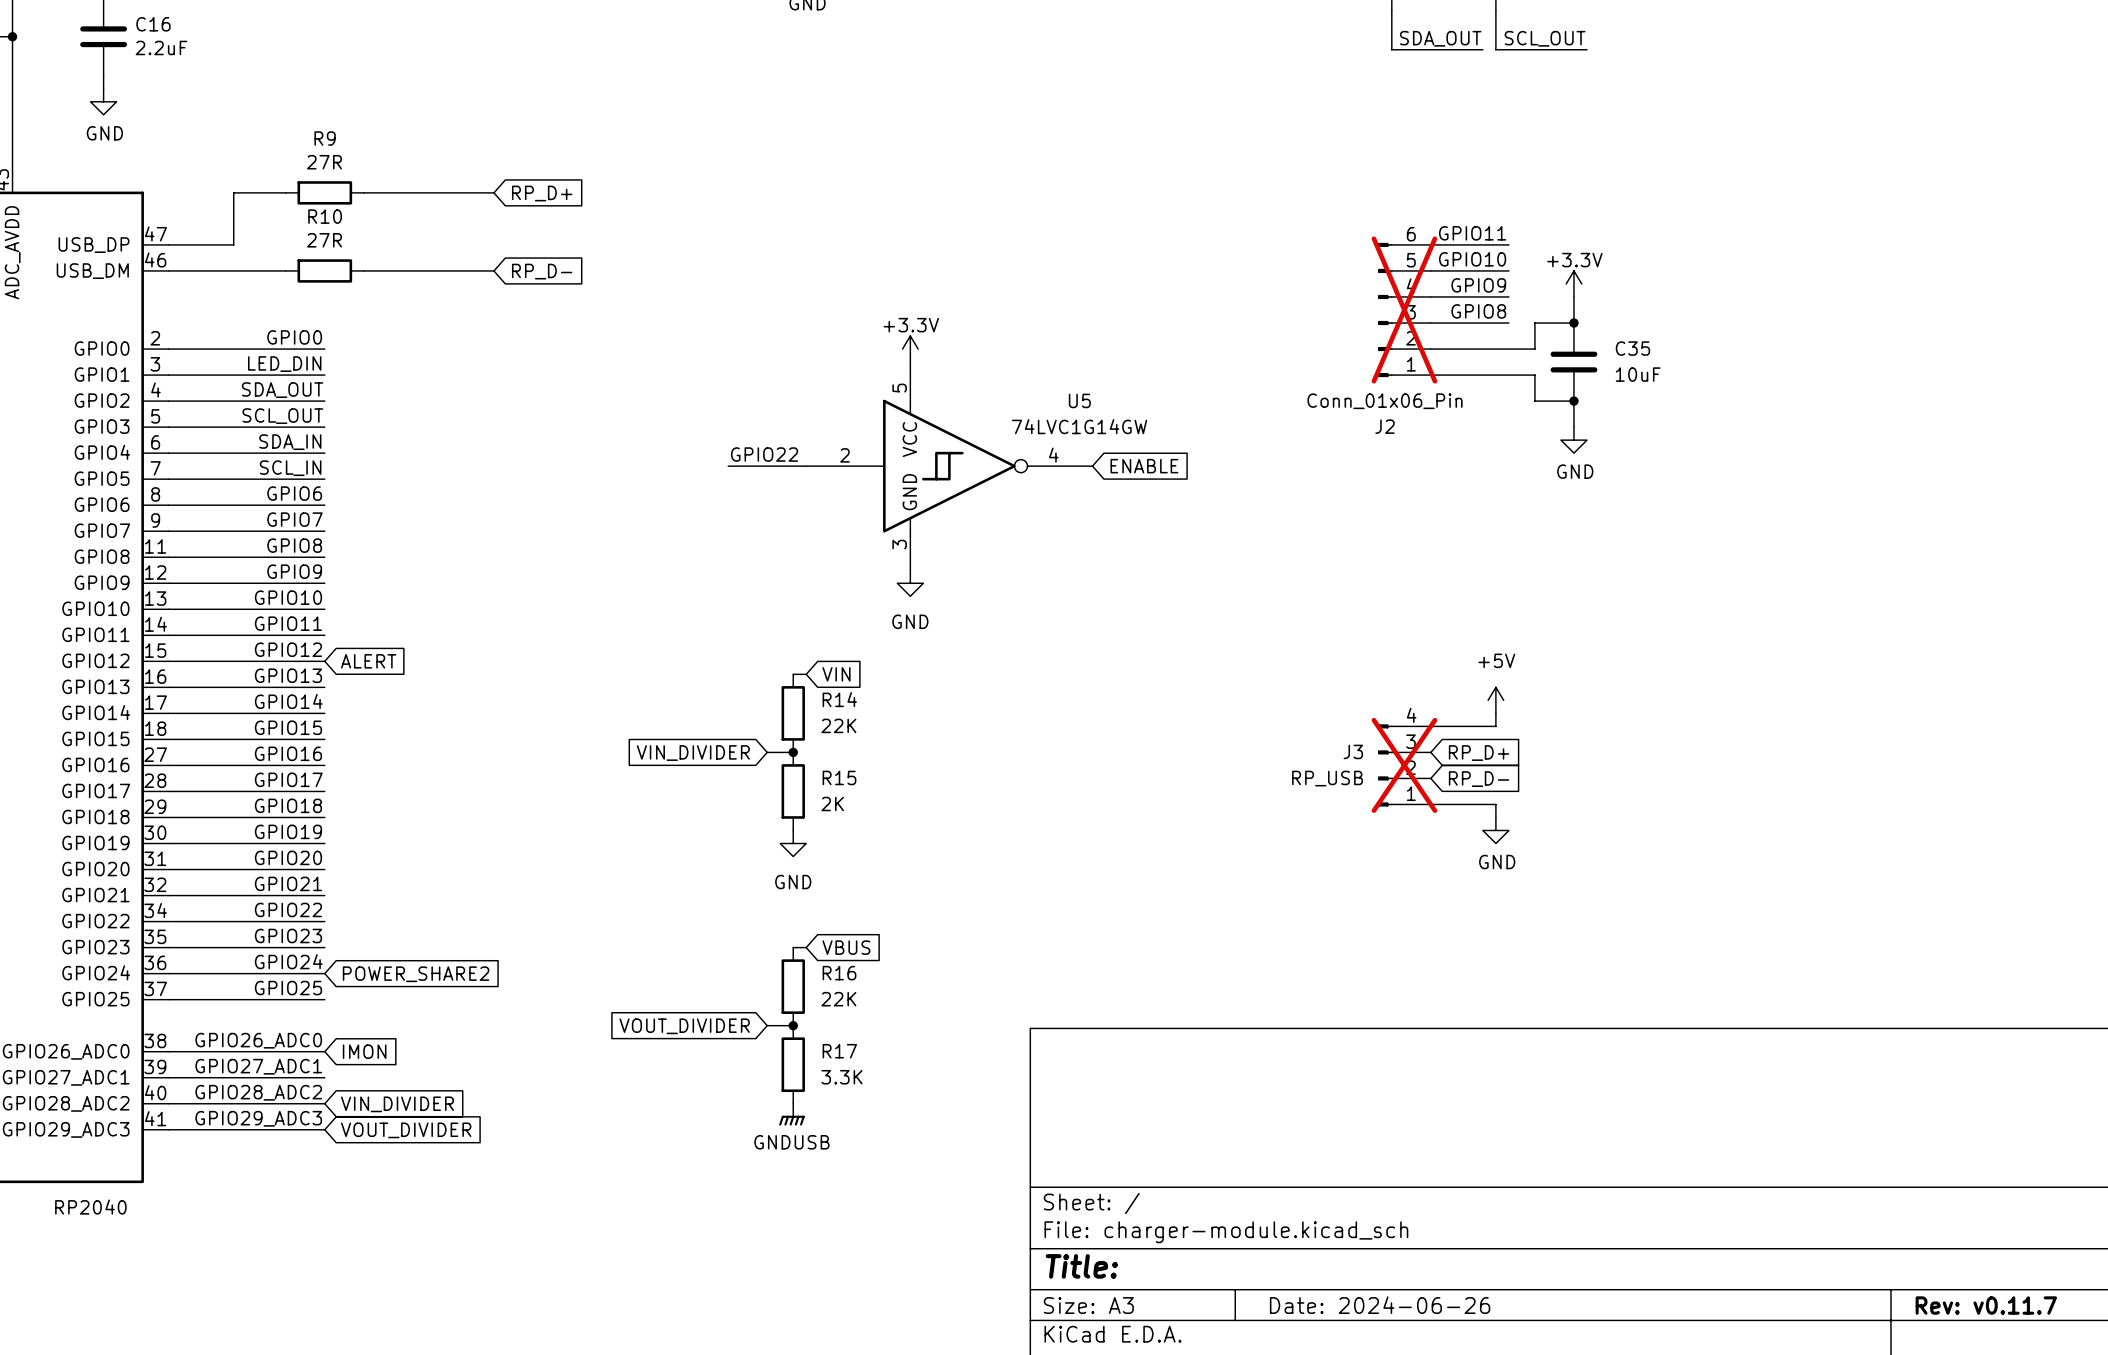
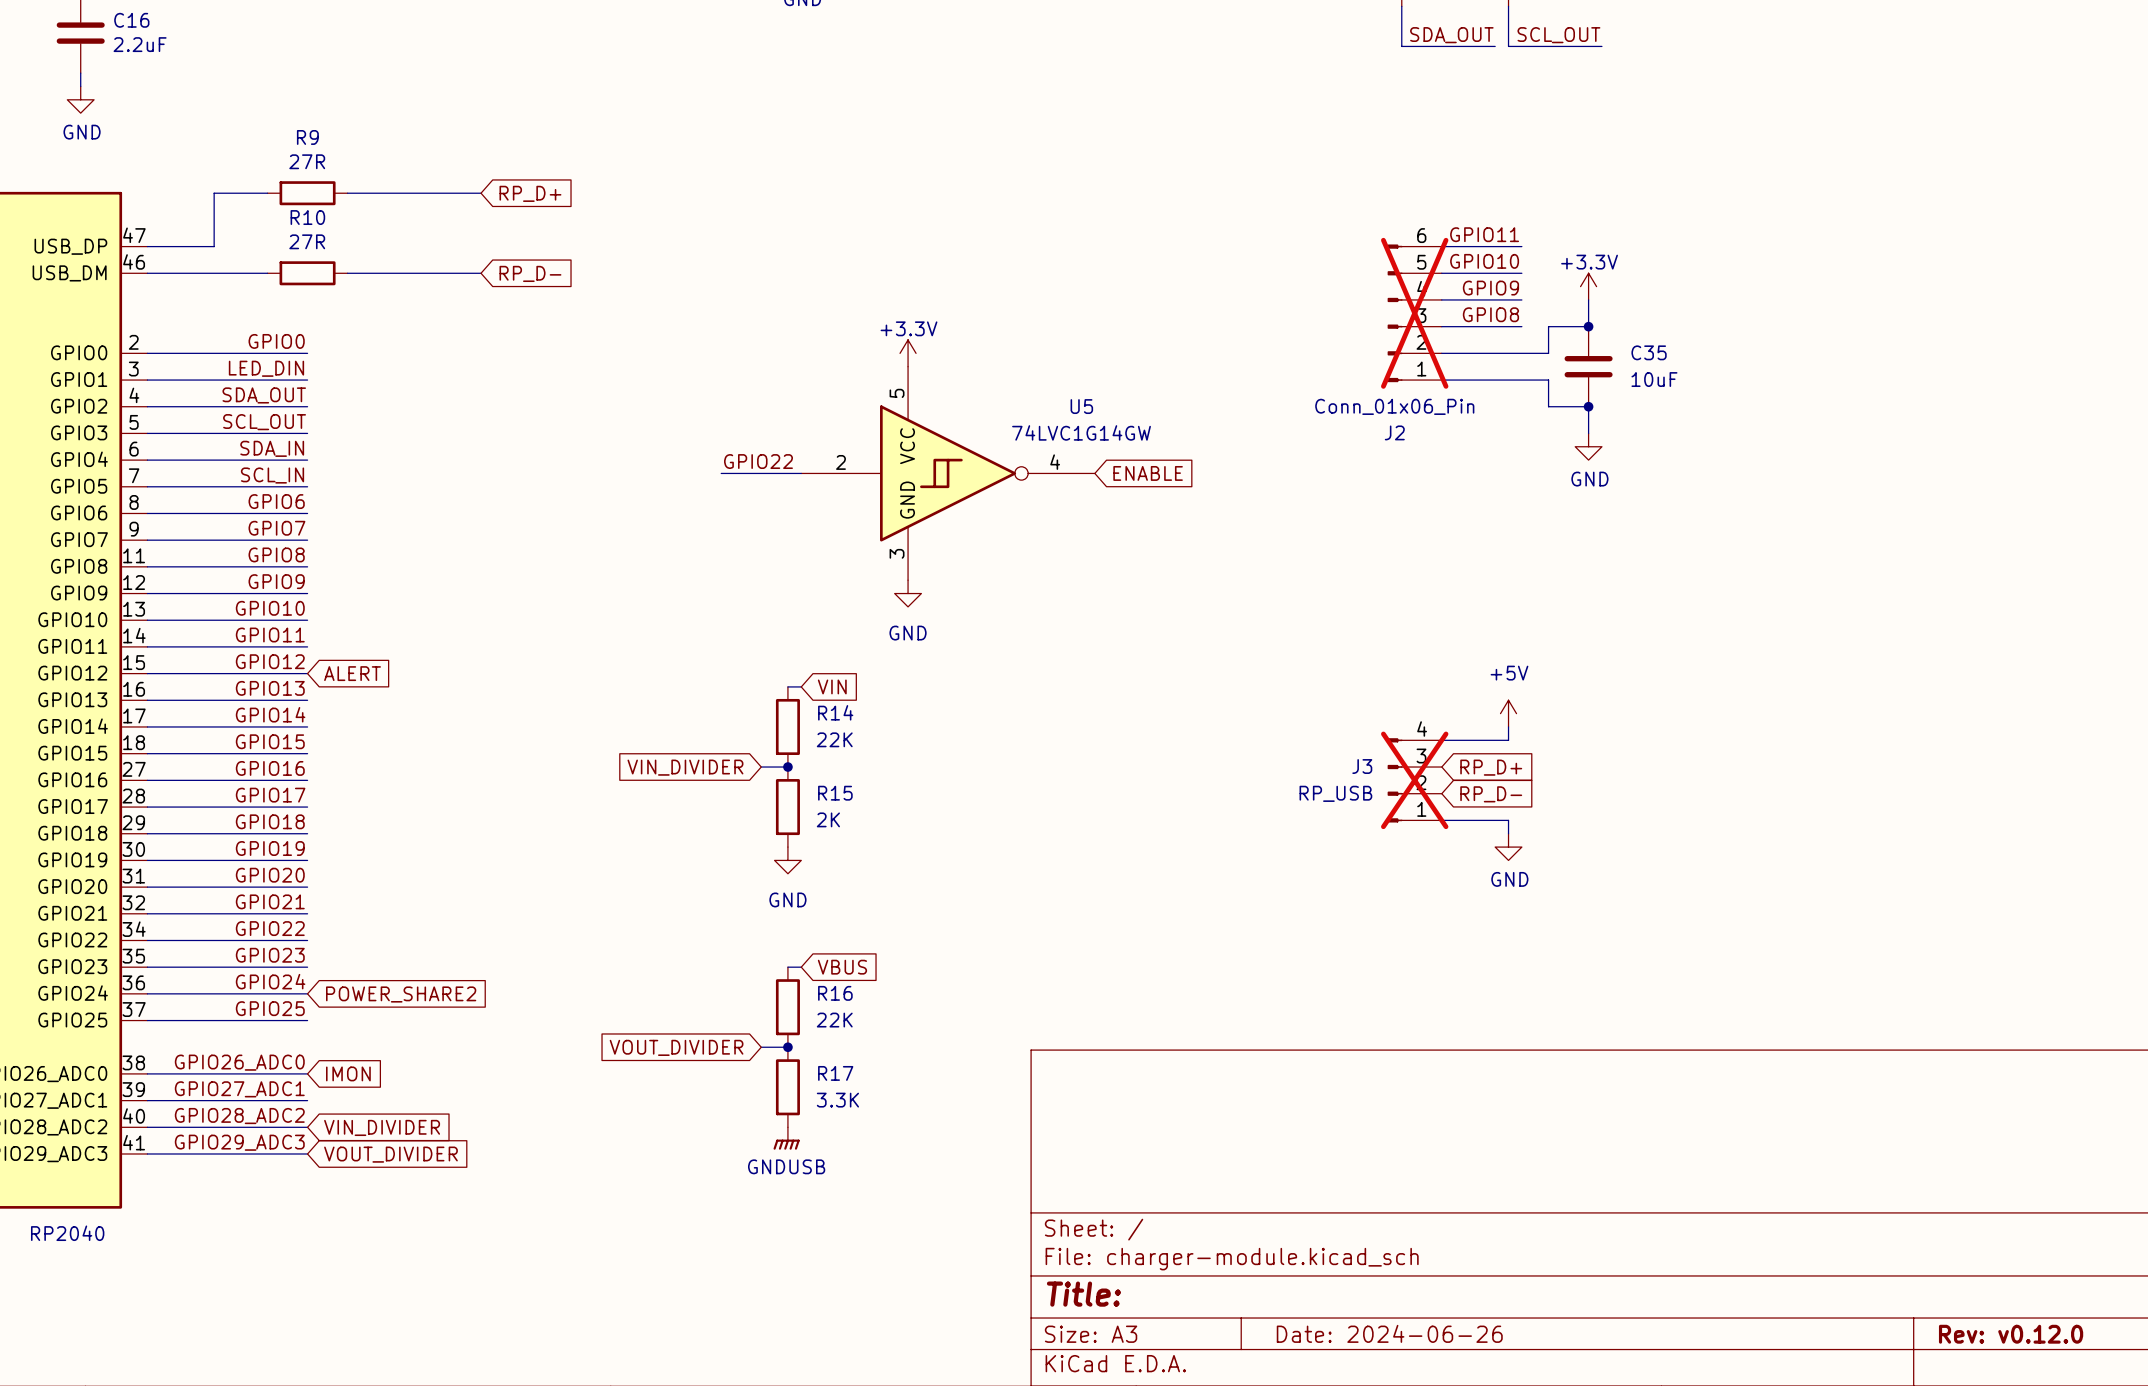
title block: Rev: v0.11.7 (1986, 1305) -> Rev: v0.12.0 (2011, 1334)

